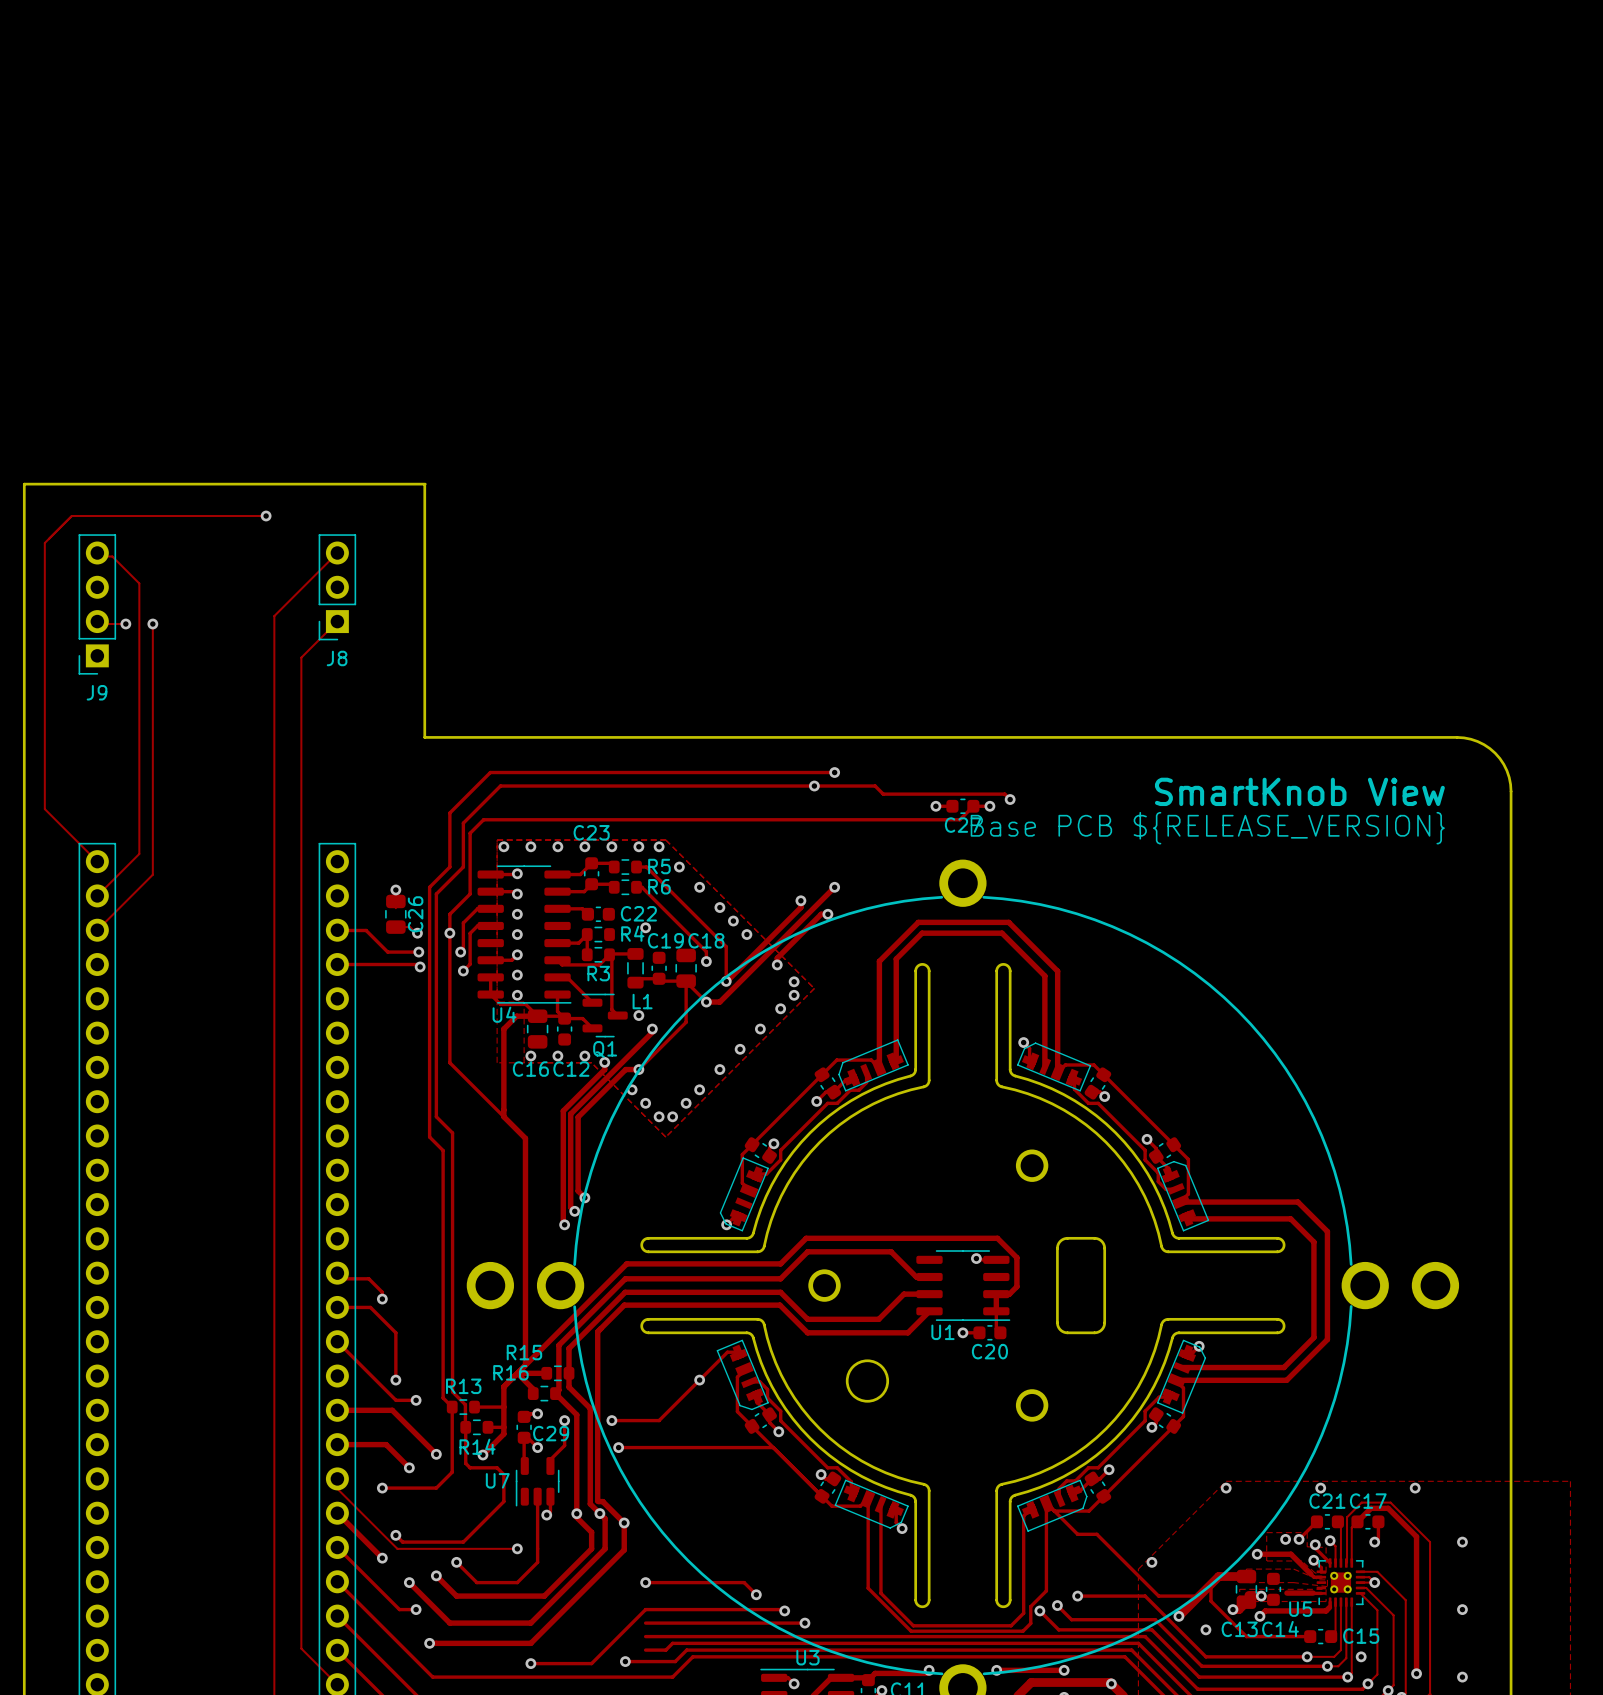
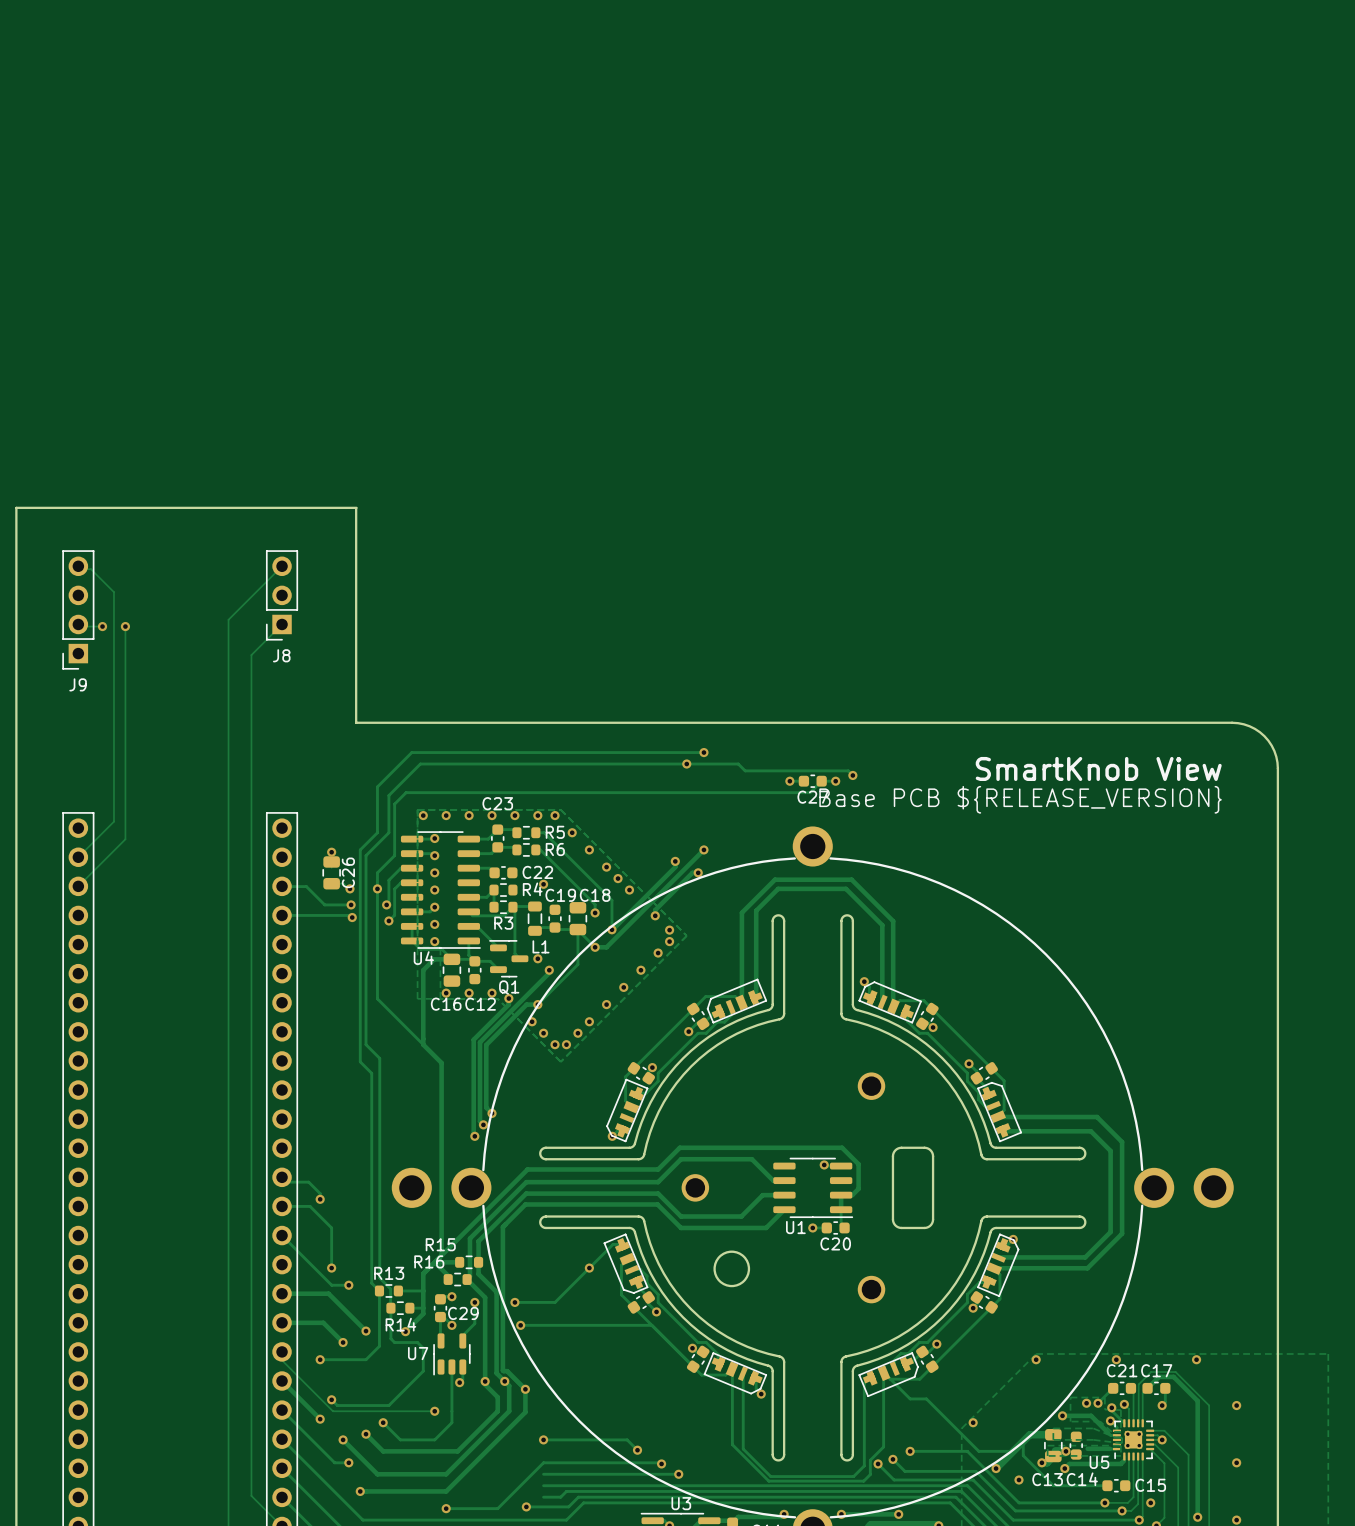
track: (266, 516) (71, 516) (44, 543) (44, 809) (97, 861) -> none
via: (266, 516) -> none

